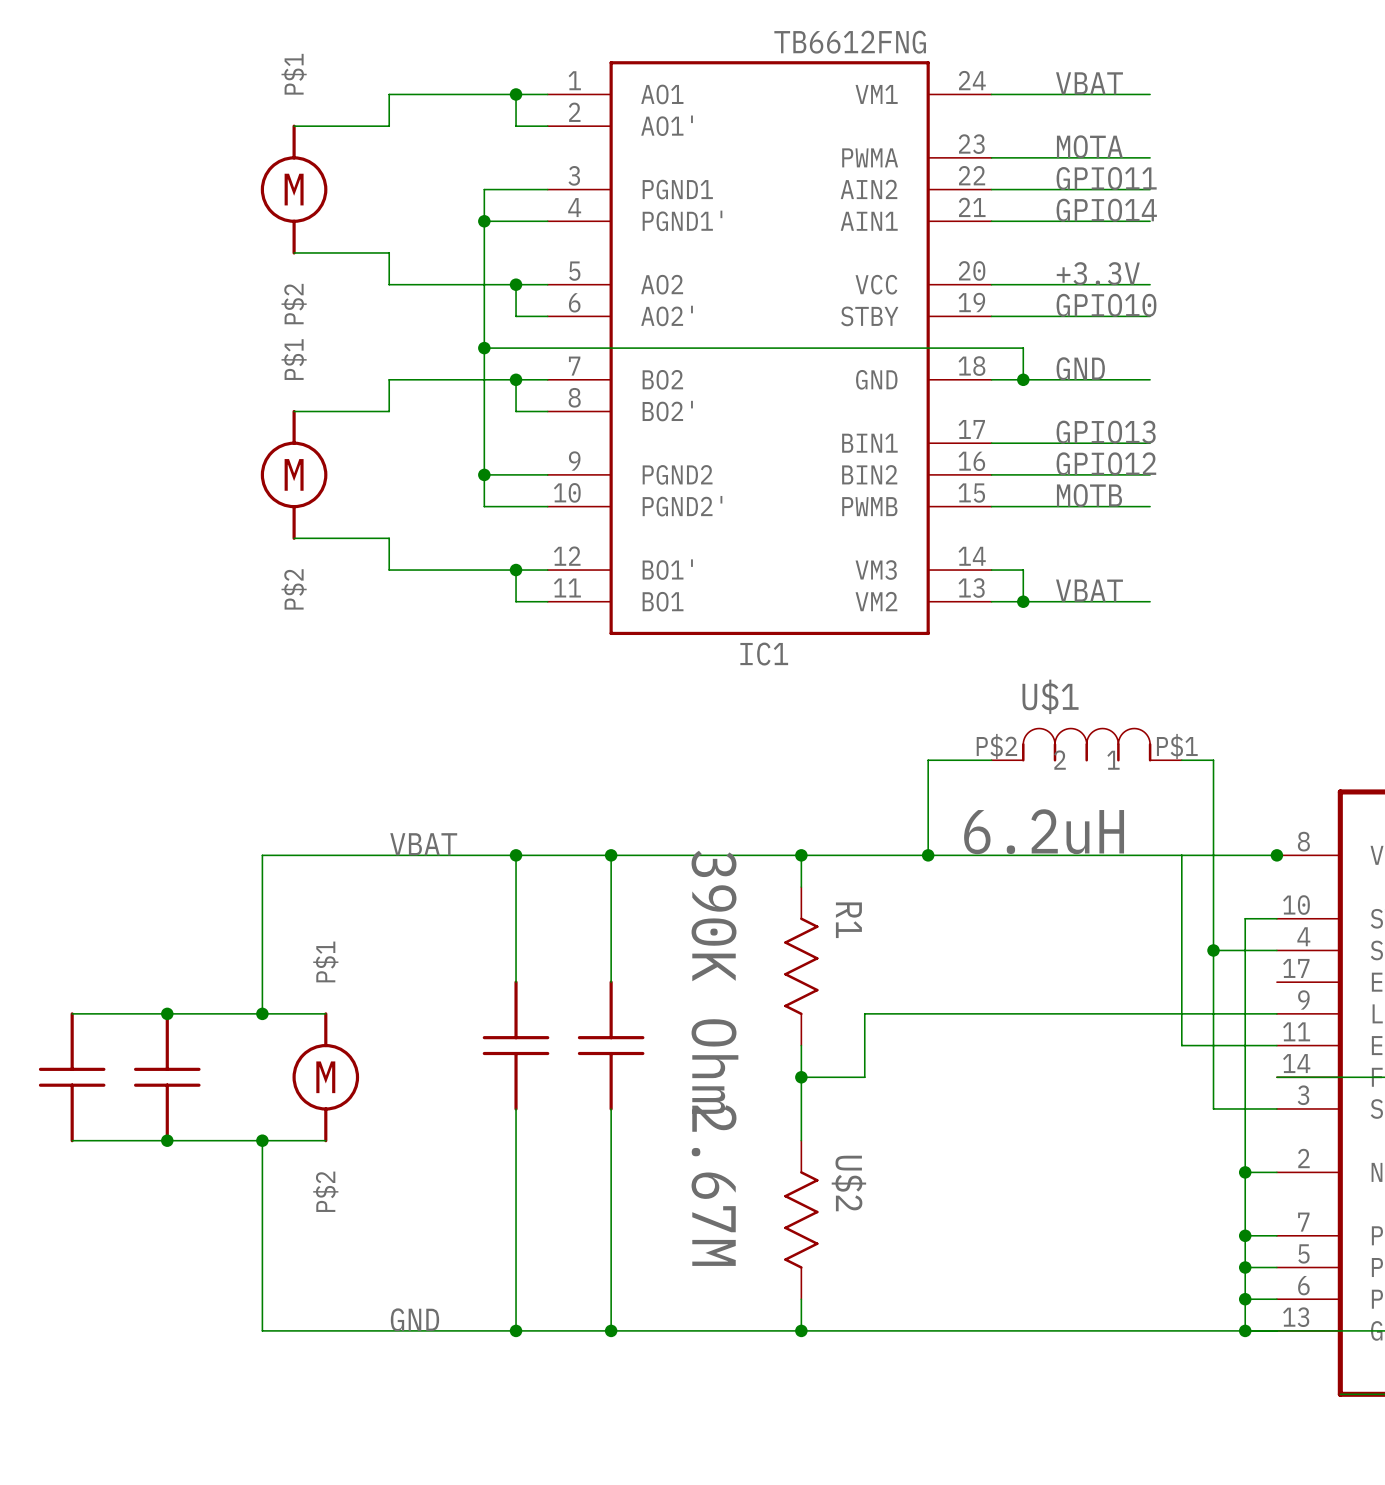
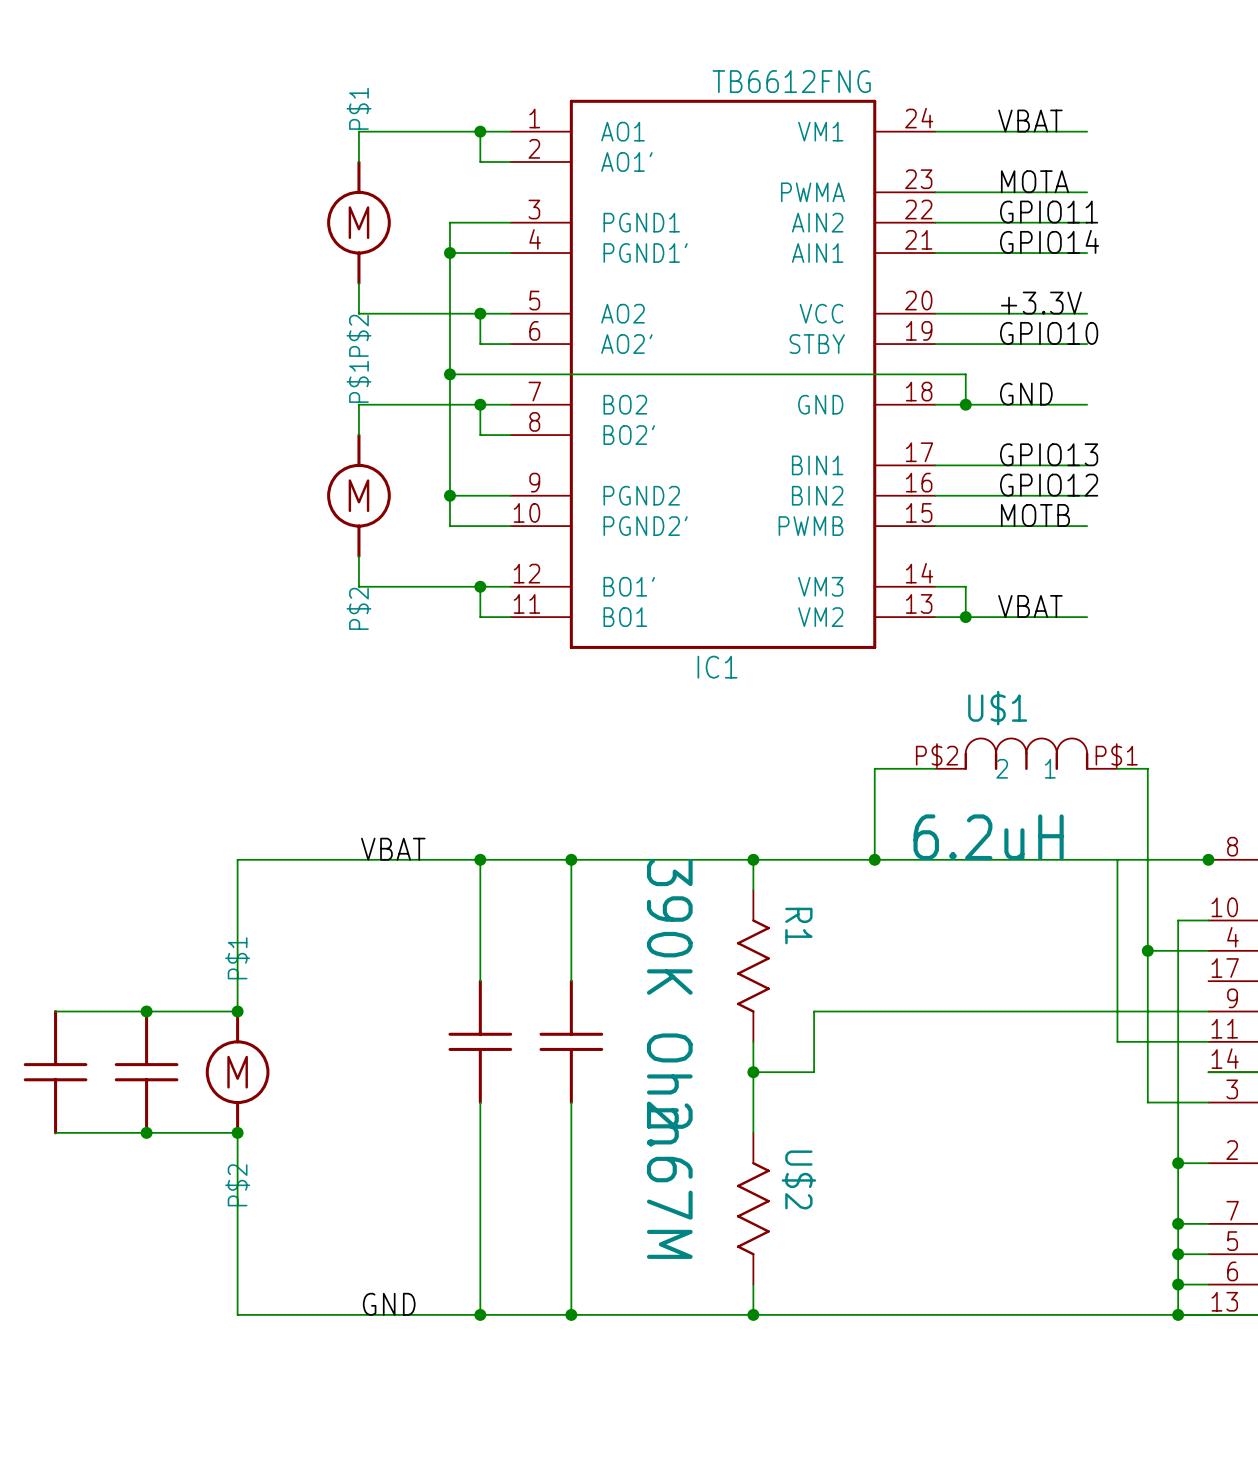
wire: (294, 126) (389, 126) -> none
part position: (294, 189) -> (358, 222)
wire: (294, 252) (389, 252) -> none
wire: (294, 411) (389, 411) -> none
part position: (294, 474) -> (358, 495)
wire: (294, 538) (389, 538) -> none
wire: (262, 1013) (325, 1013) -> none
part position: (325, 1077) -> (237, 1072)
wire: (262, 1140) (325, 1140) -> none

